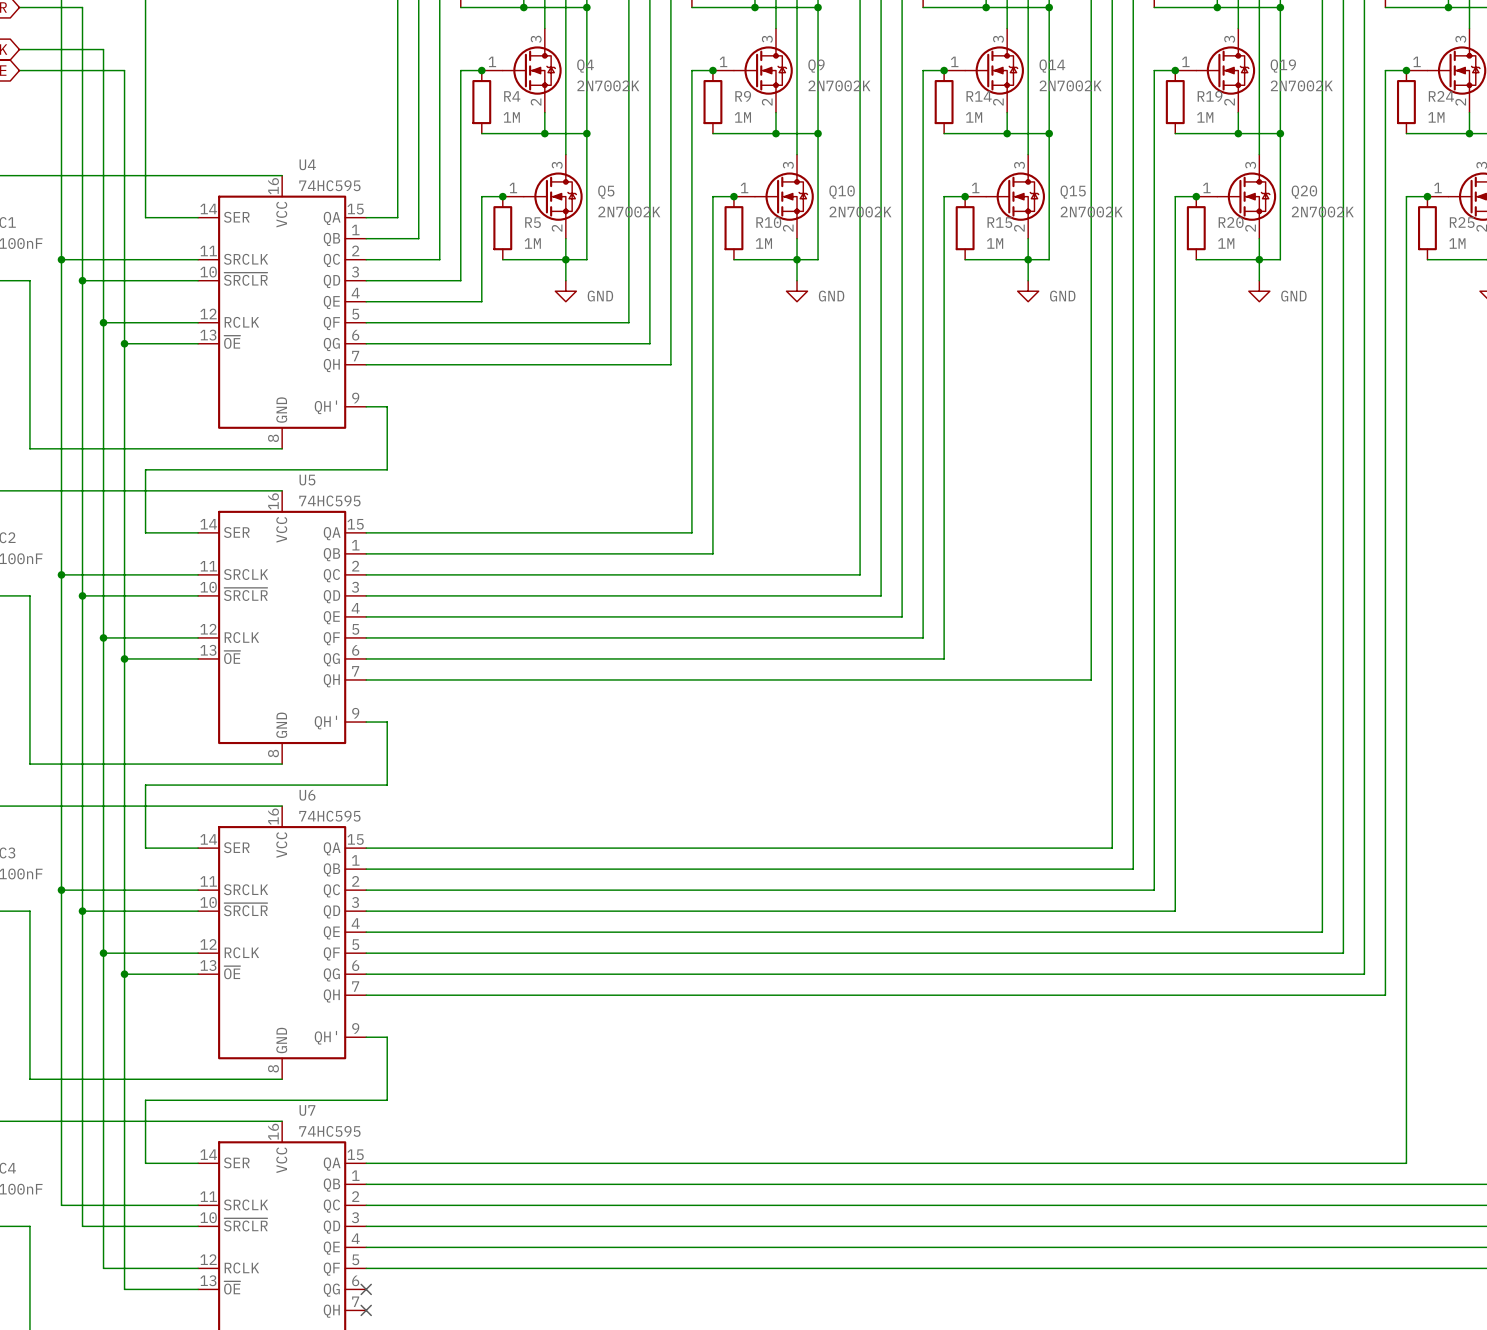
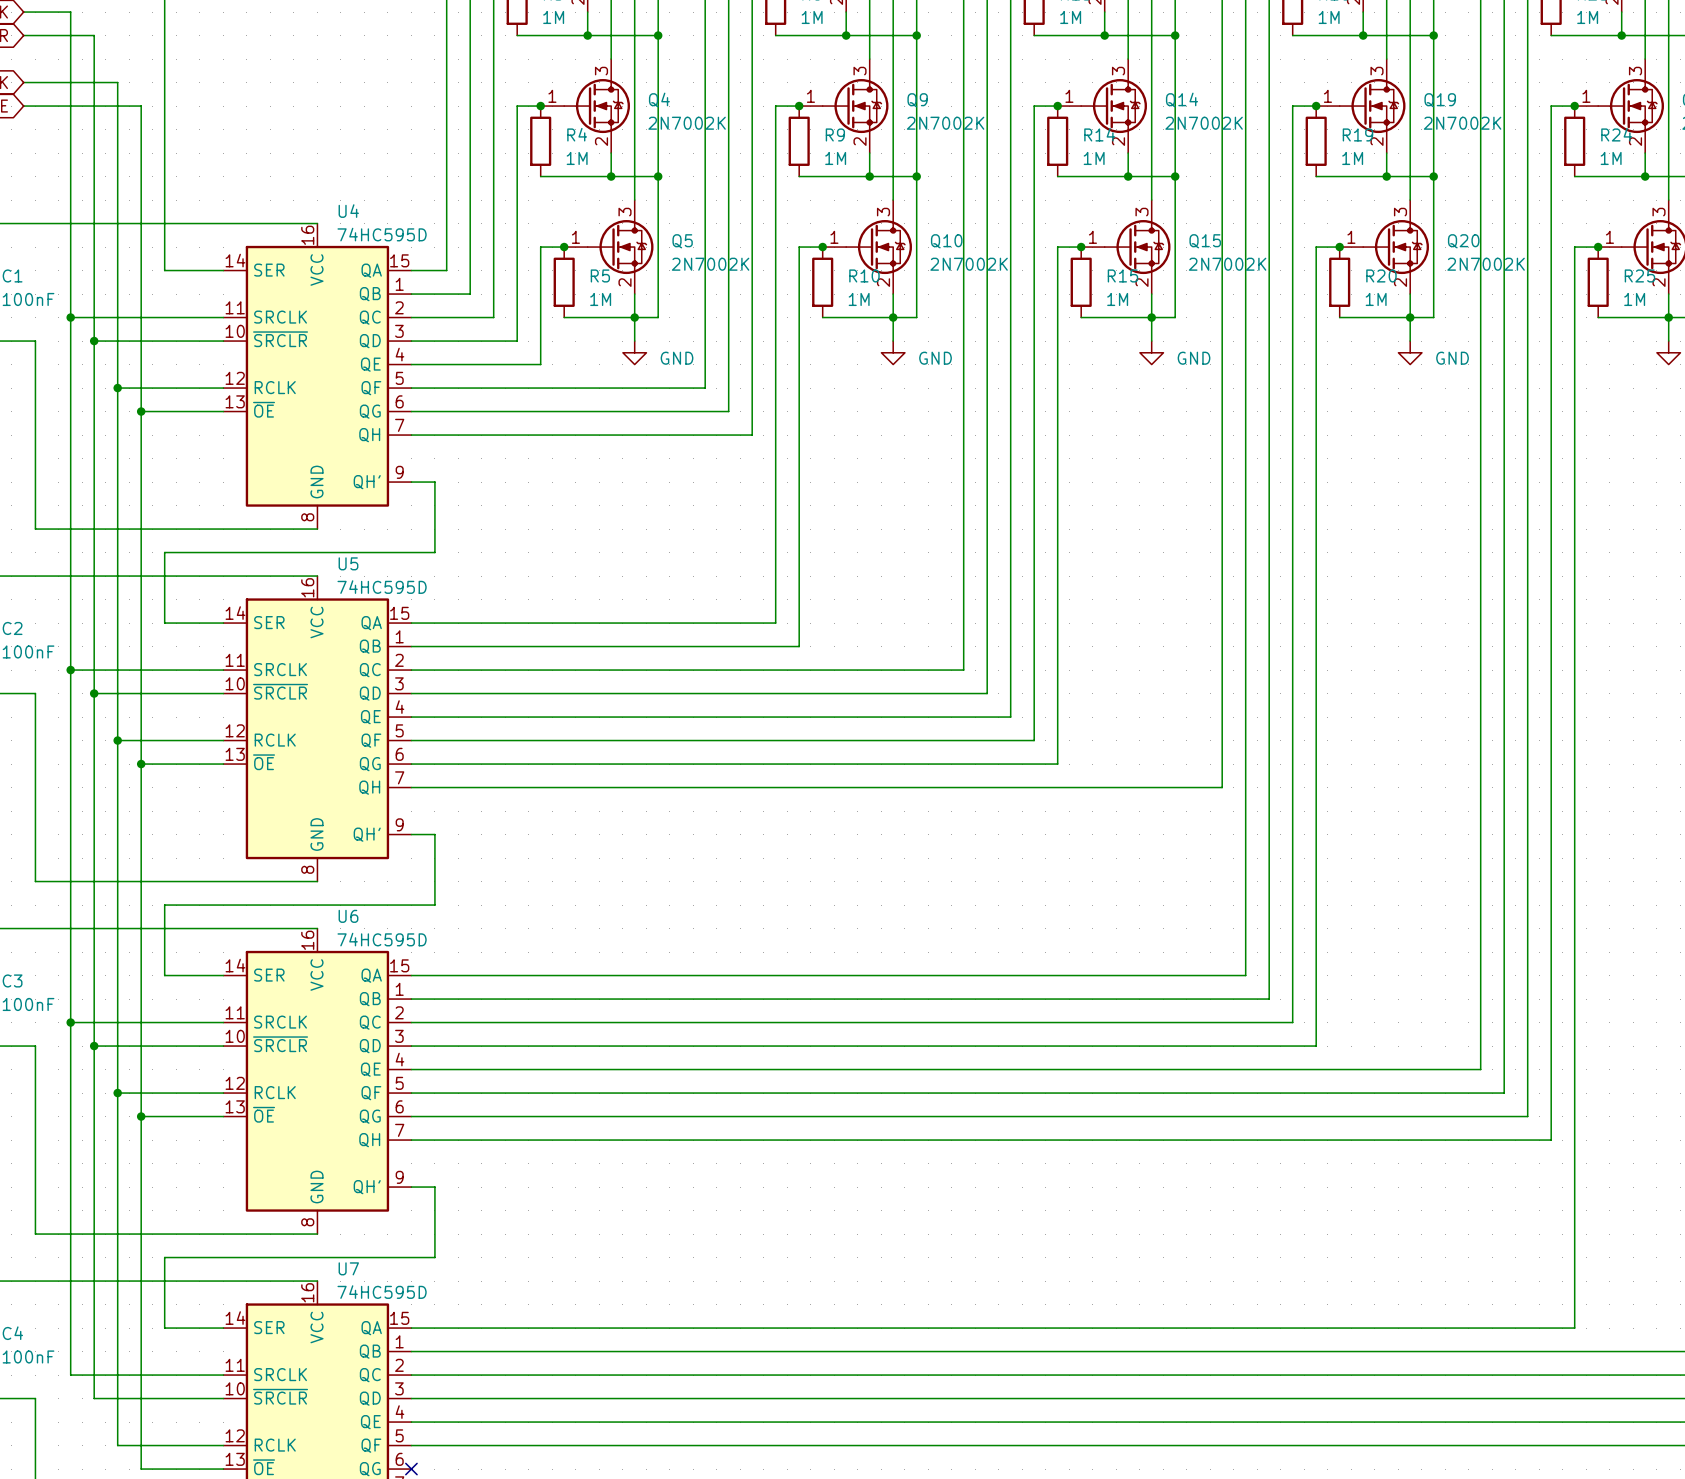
U4 value: 74HC595 (329, 185) -> 74HC595D (382, 234)
U5 value: 74HC595 (329, 500) -> 74HC595D (382, 587)
U6 value: 74HC595 (329, 816) -> 74HC595D (382, 939)
U7 value: 74HC595 (329, 1131) -> 74HC595D (382, 1292)

